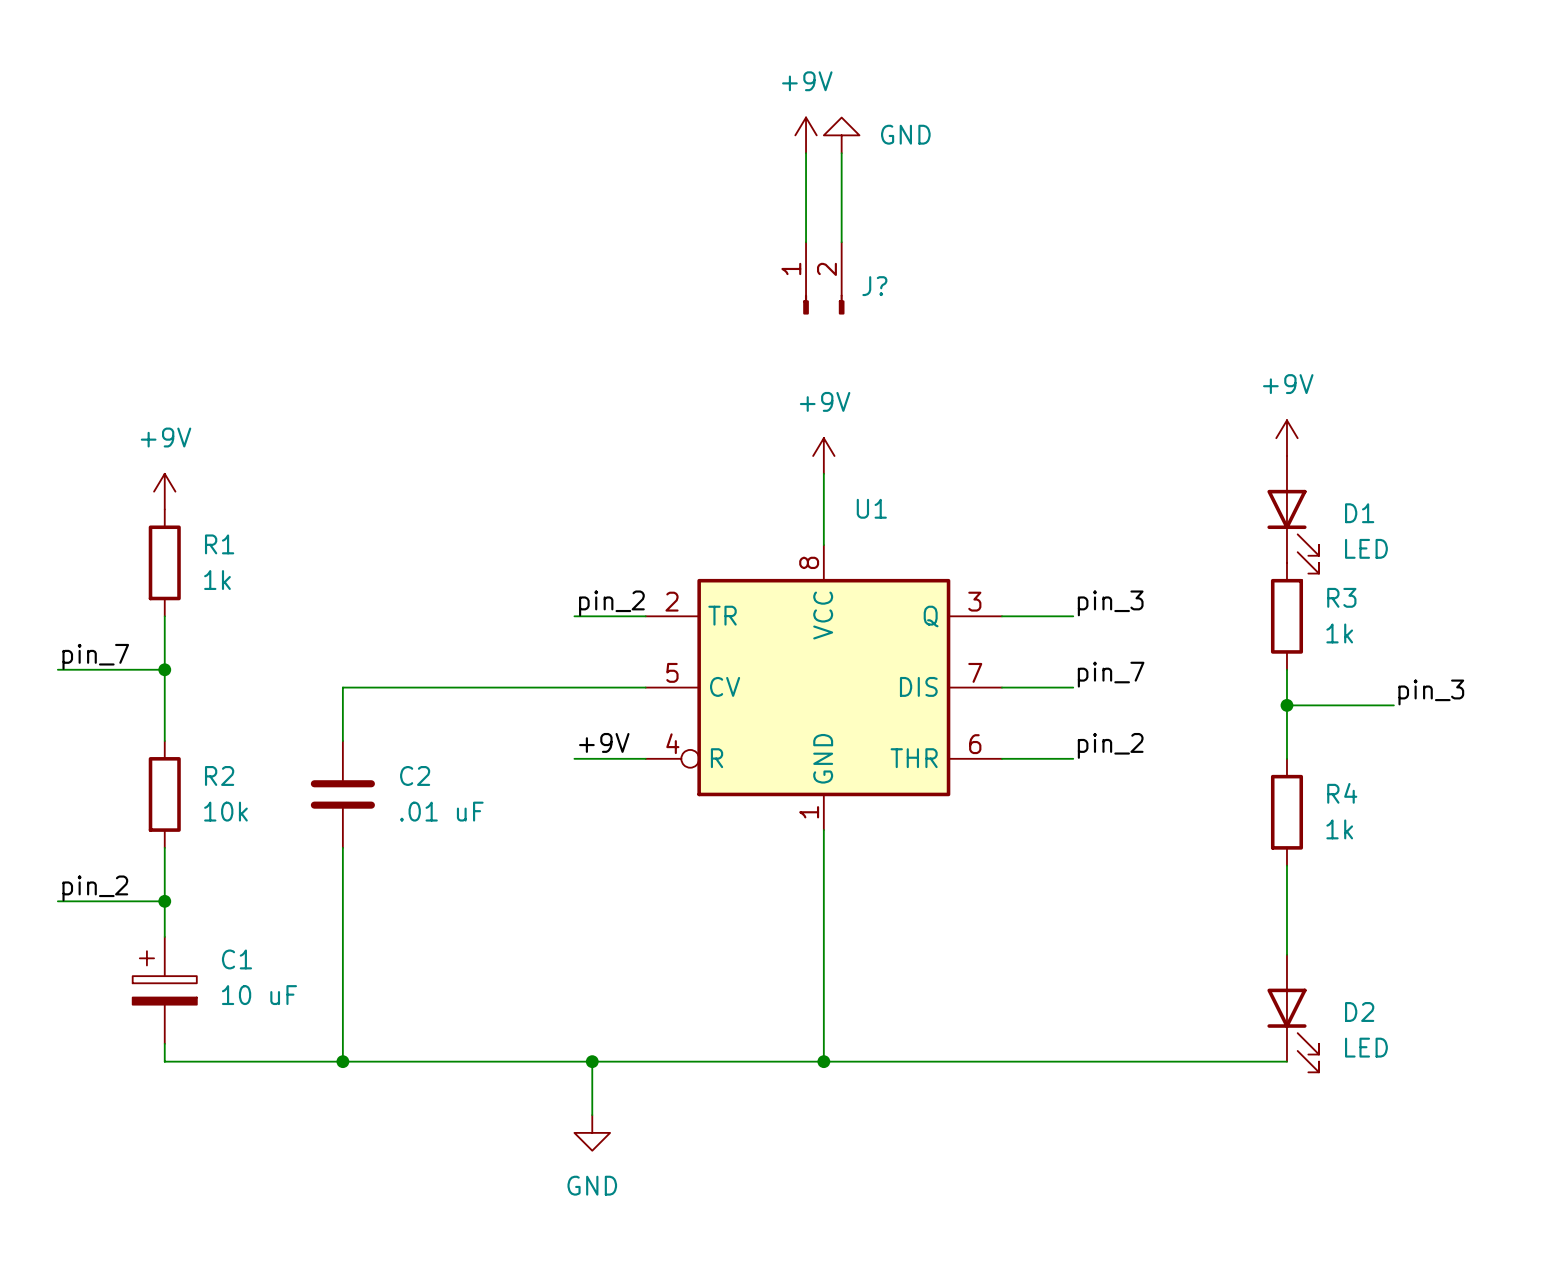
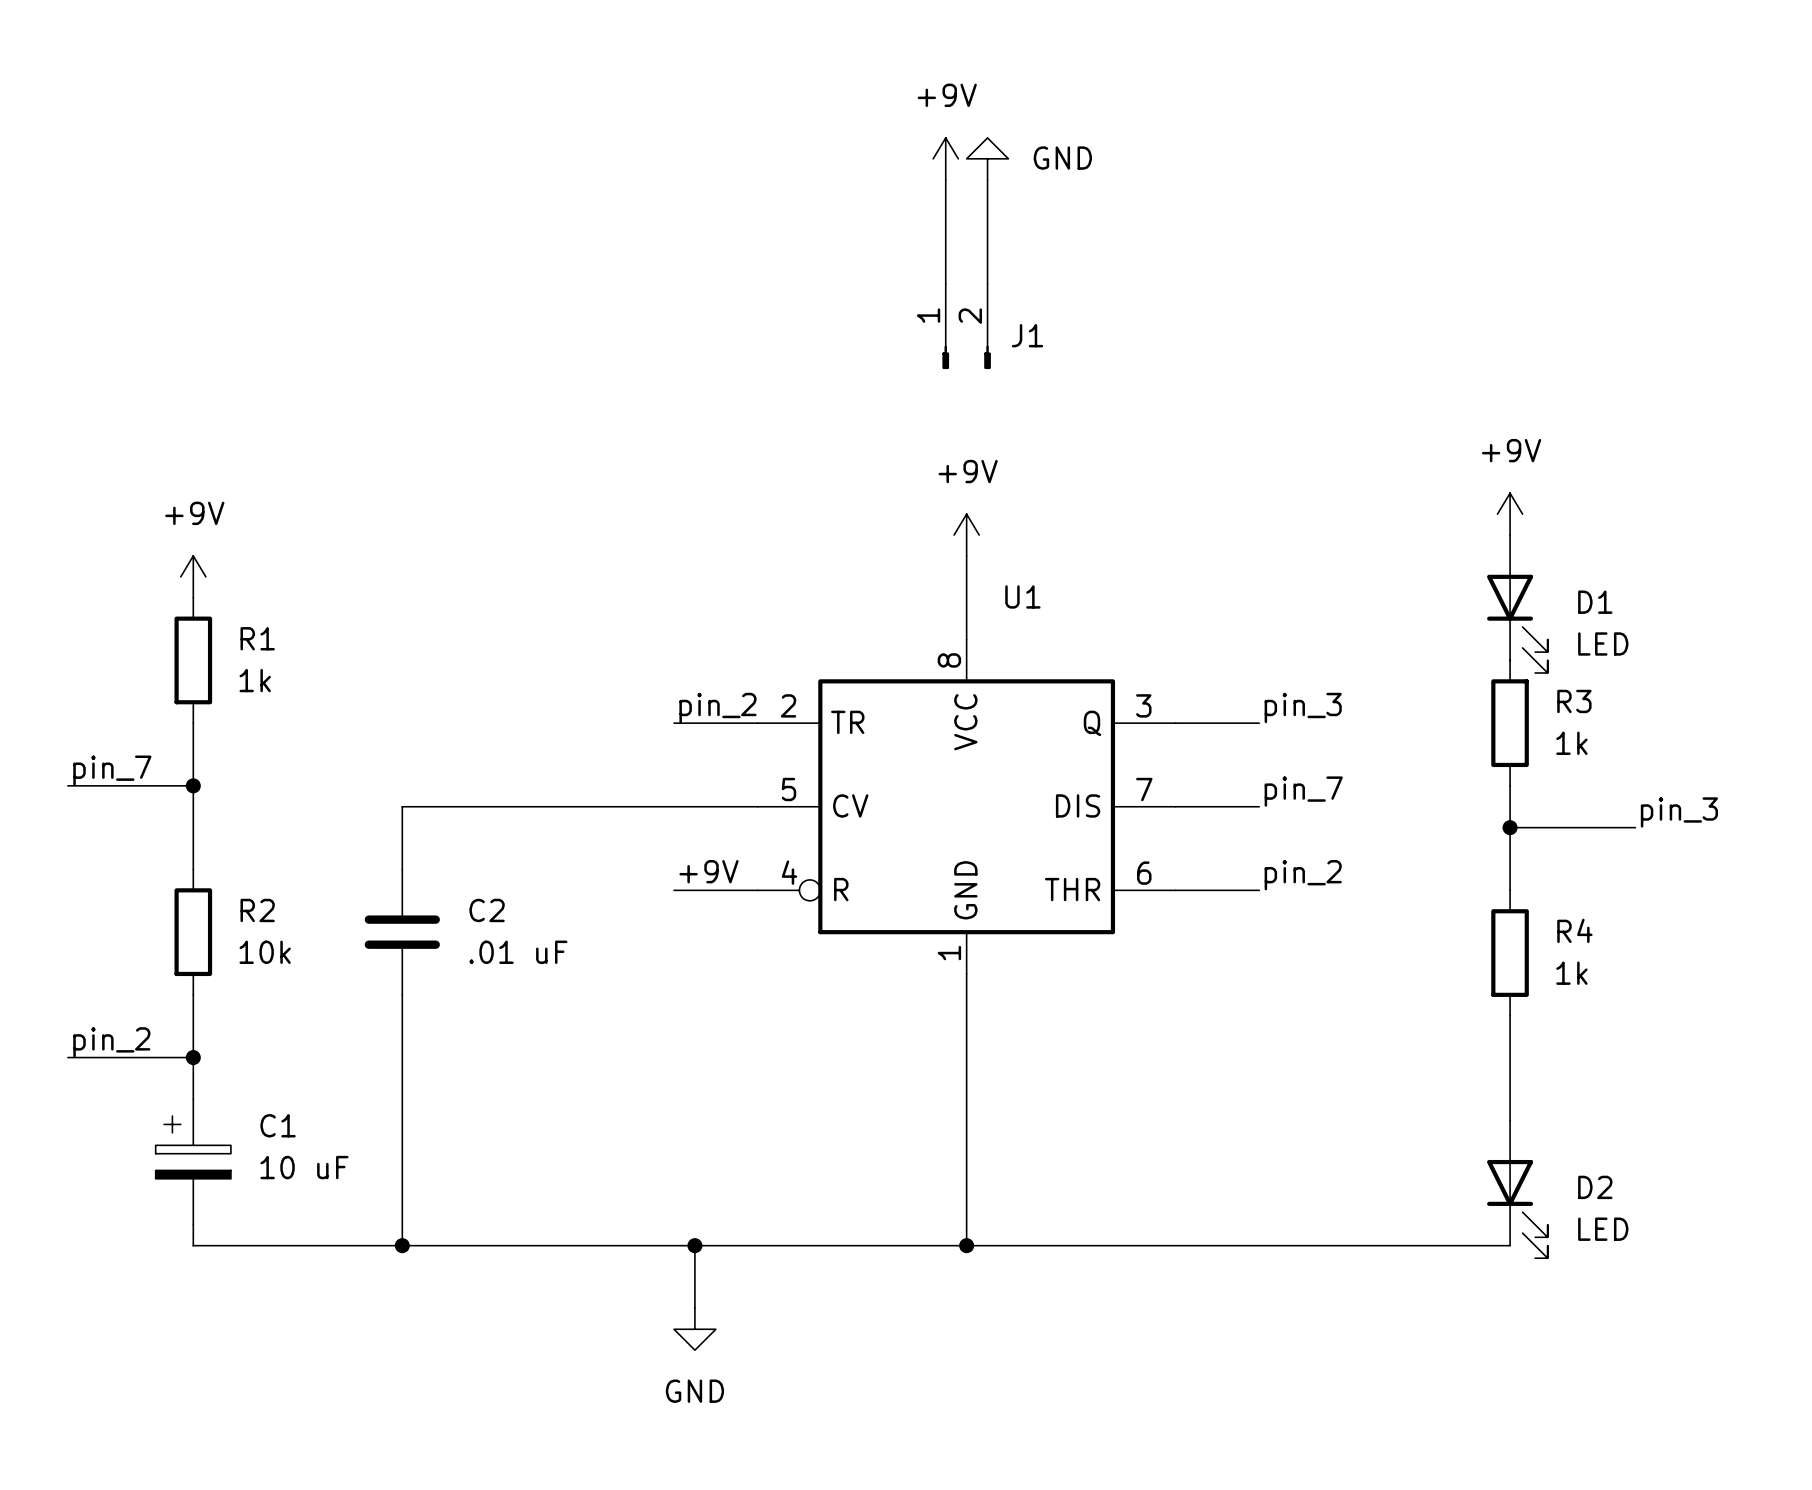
J? name: J? (874, 286) -> J1 (1027, 335)

